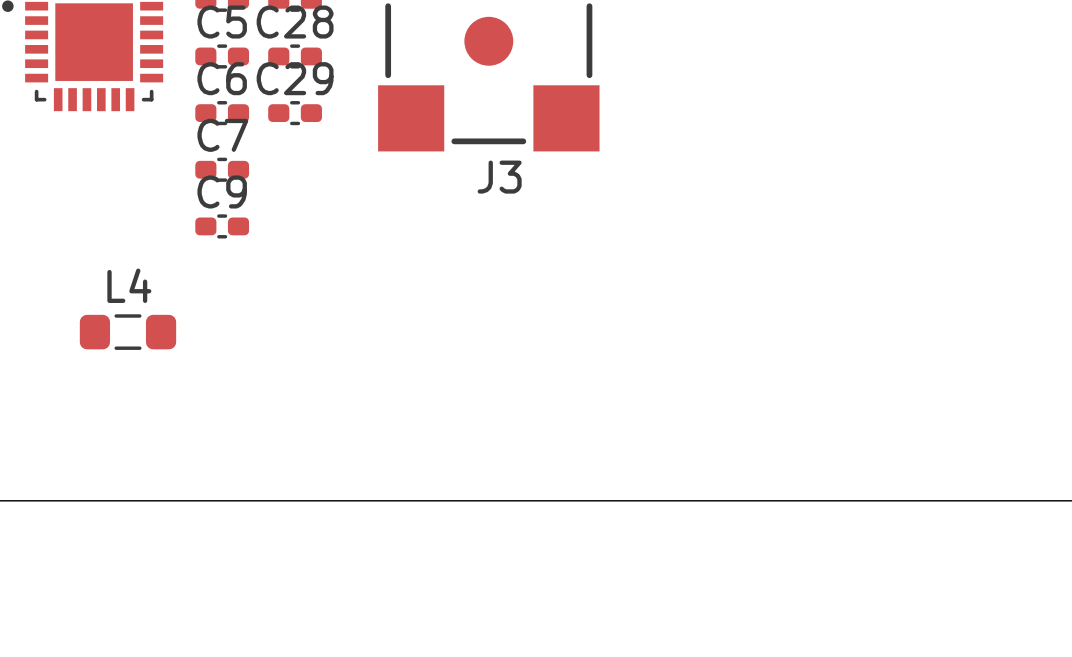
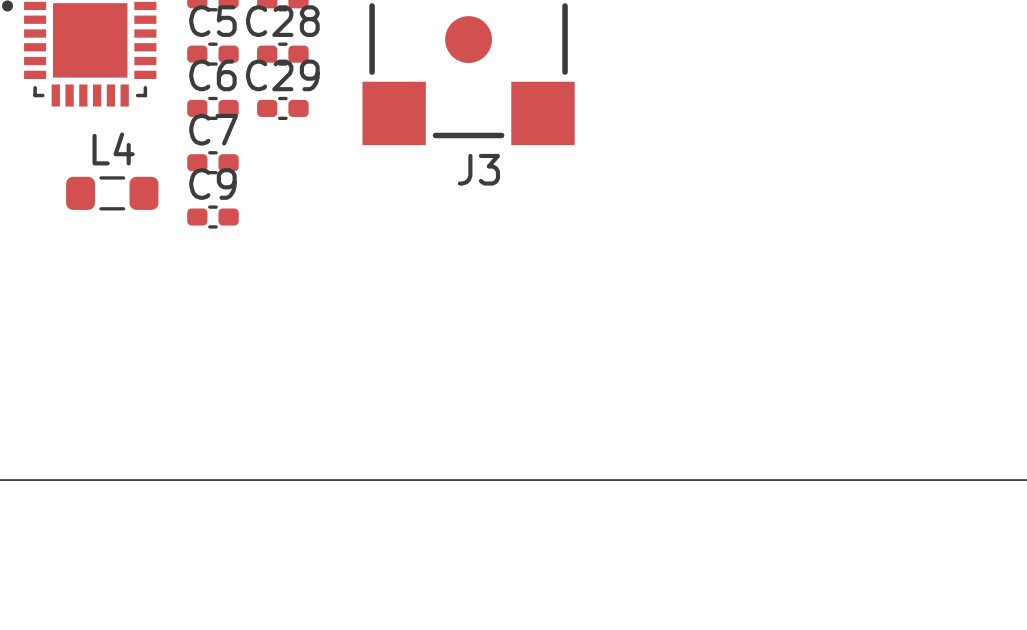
L4 position: (127, 332) -> (112, 193)

